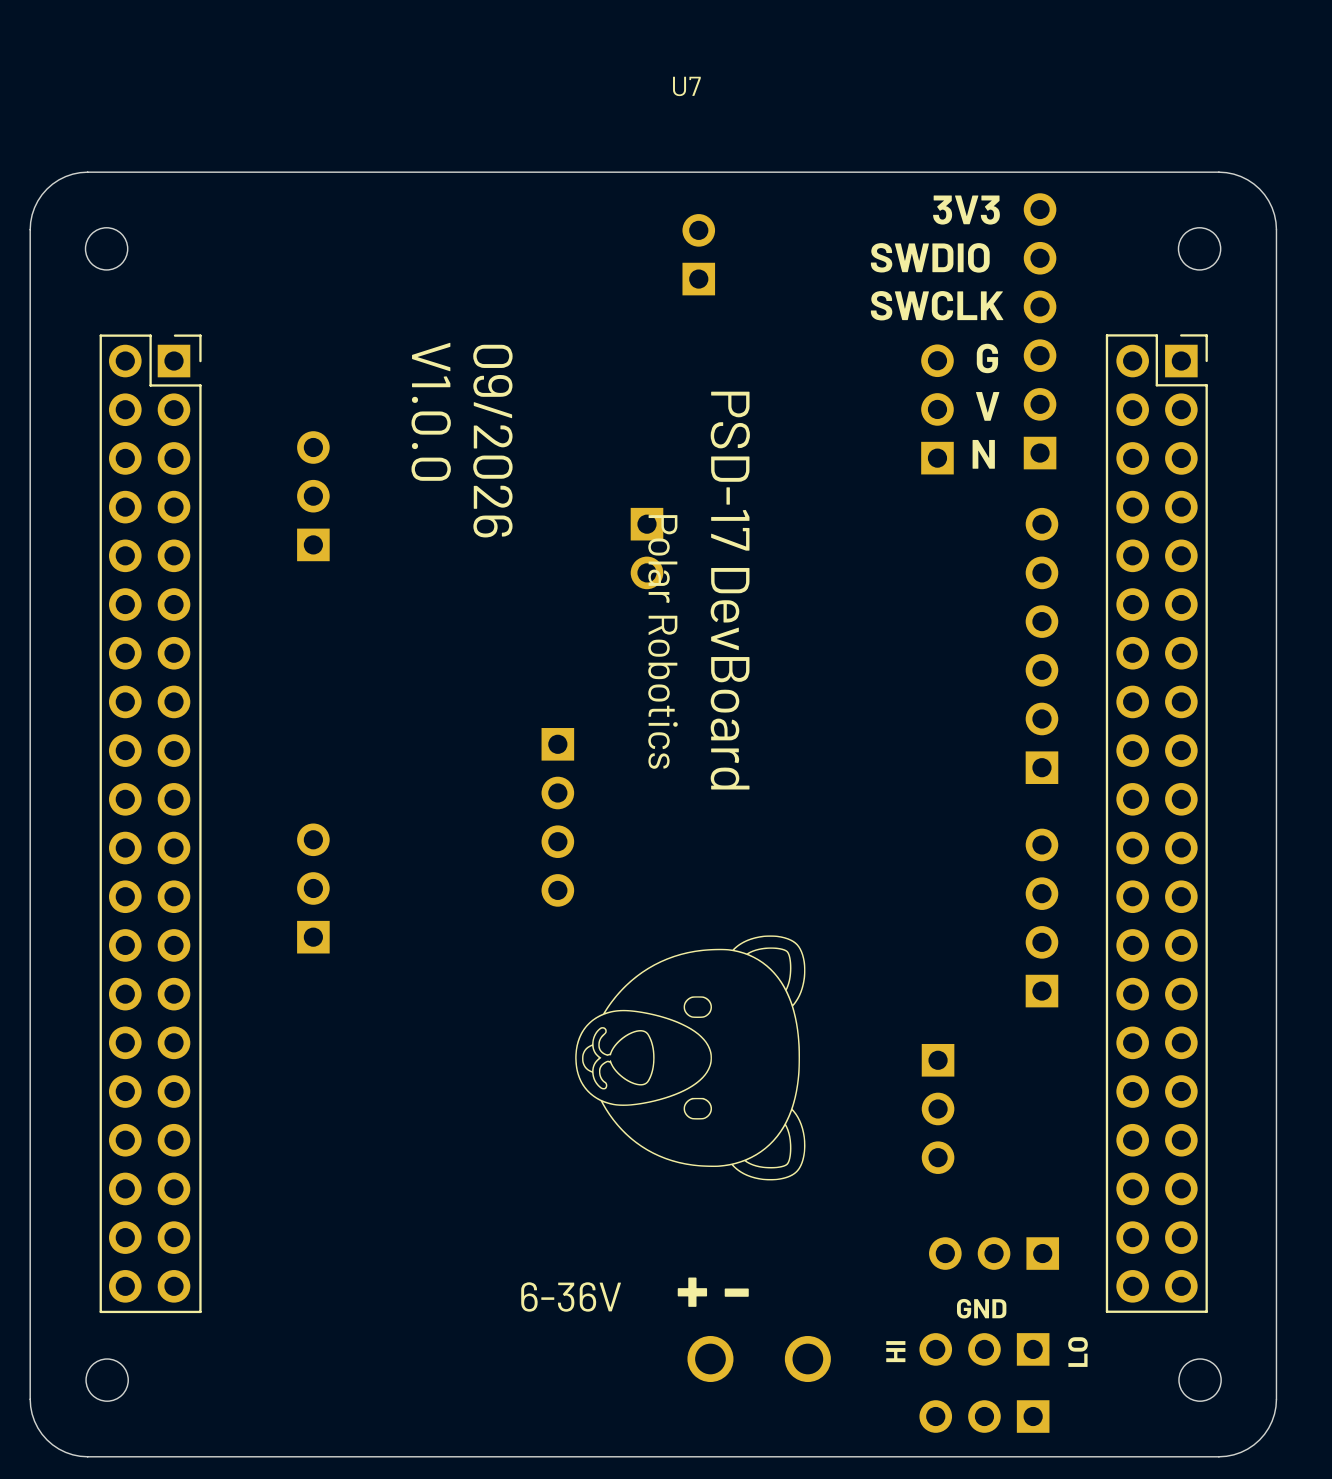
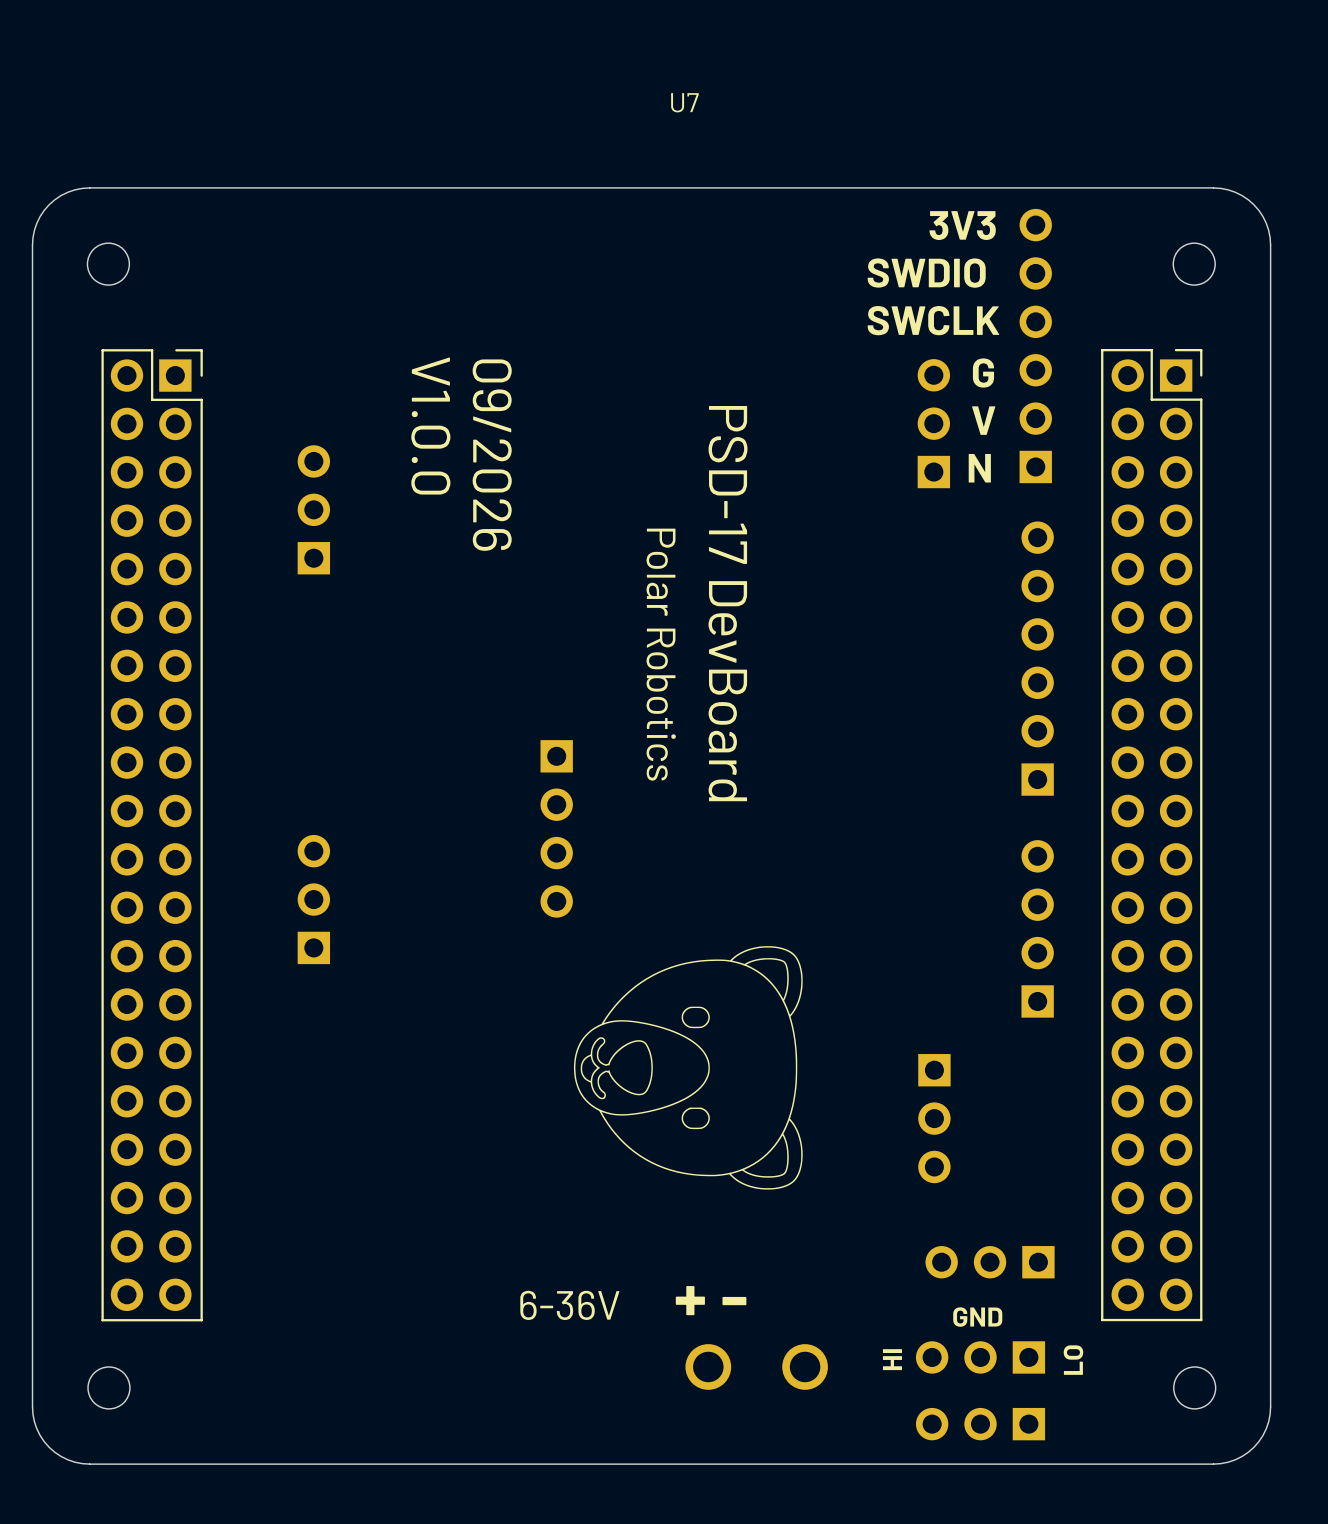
part: (698, 254) -> none
part: (647, 548) -> none

